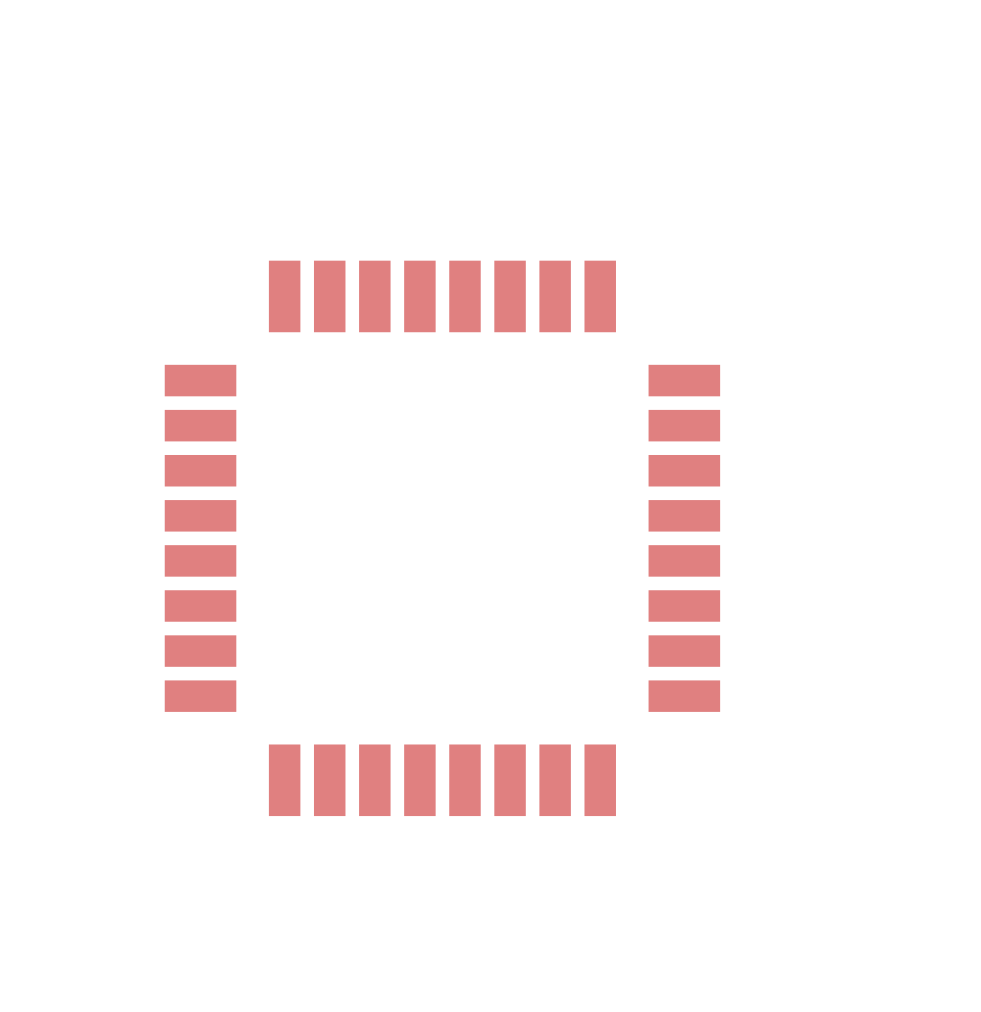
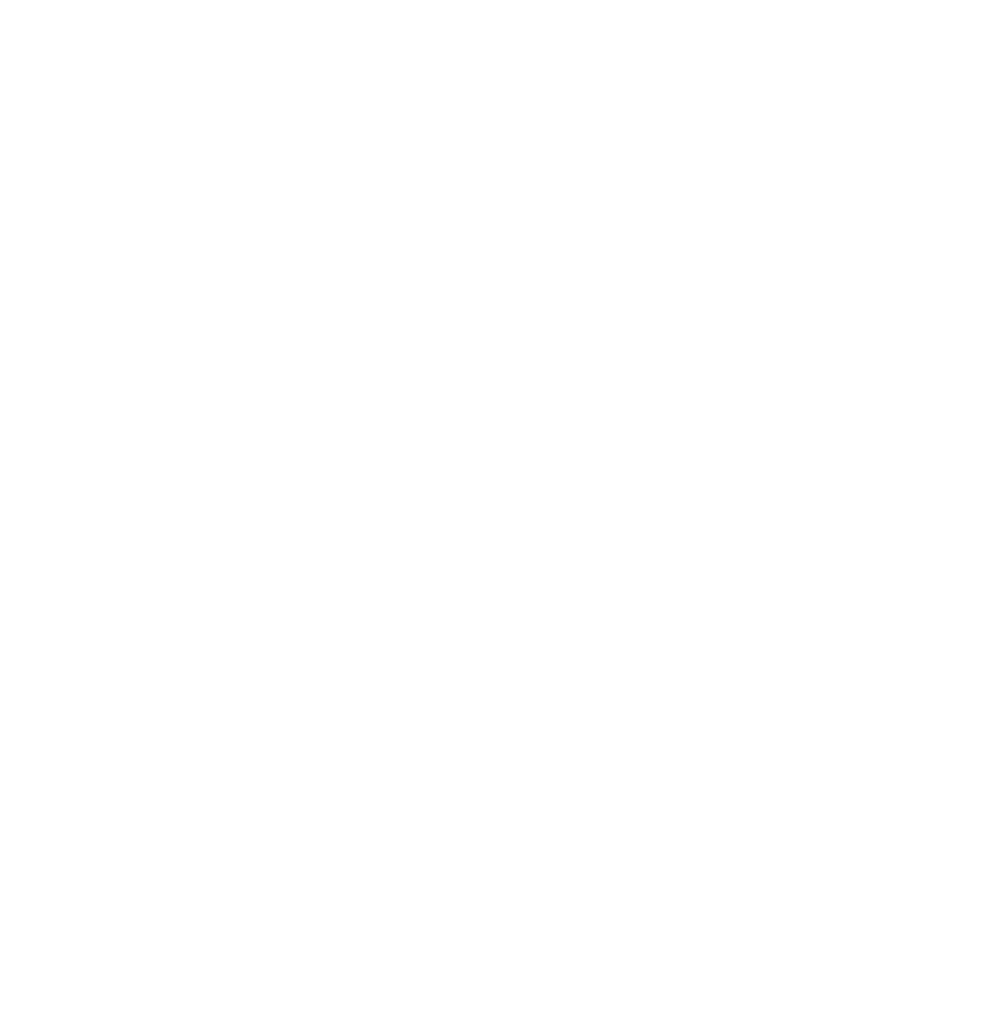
part: (442, 538) -> none

